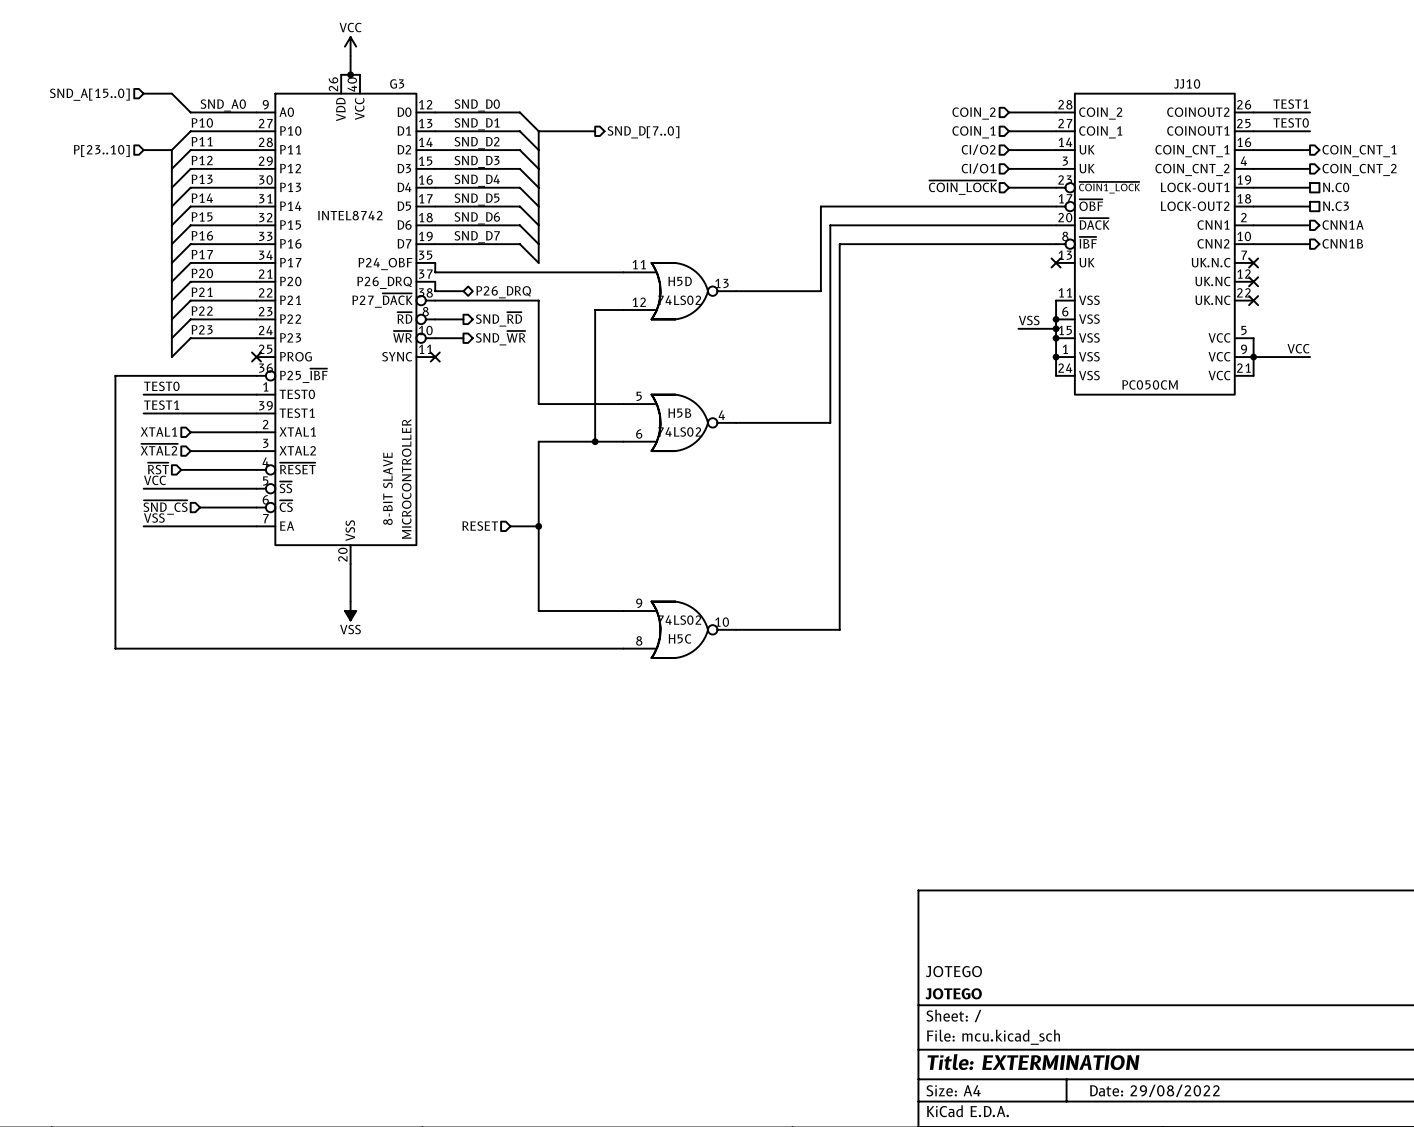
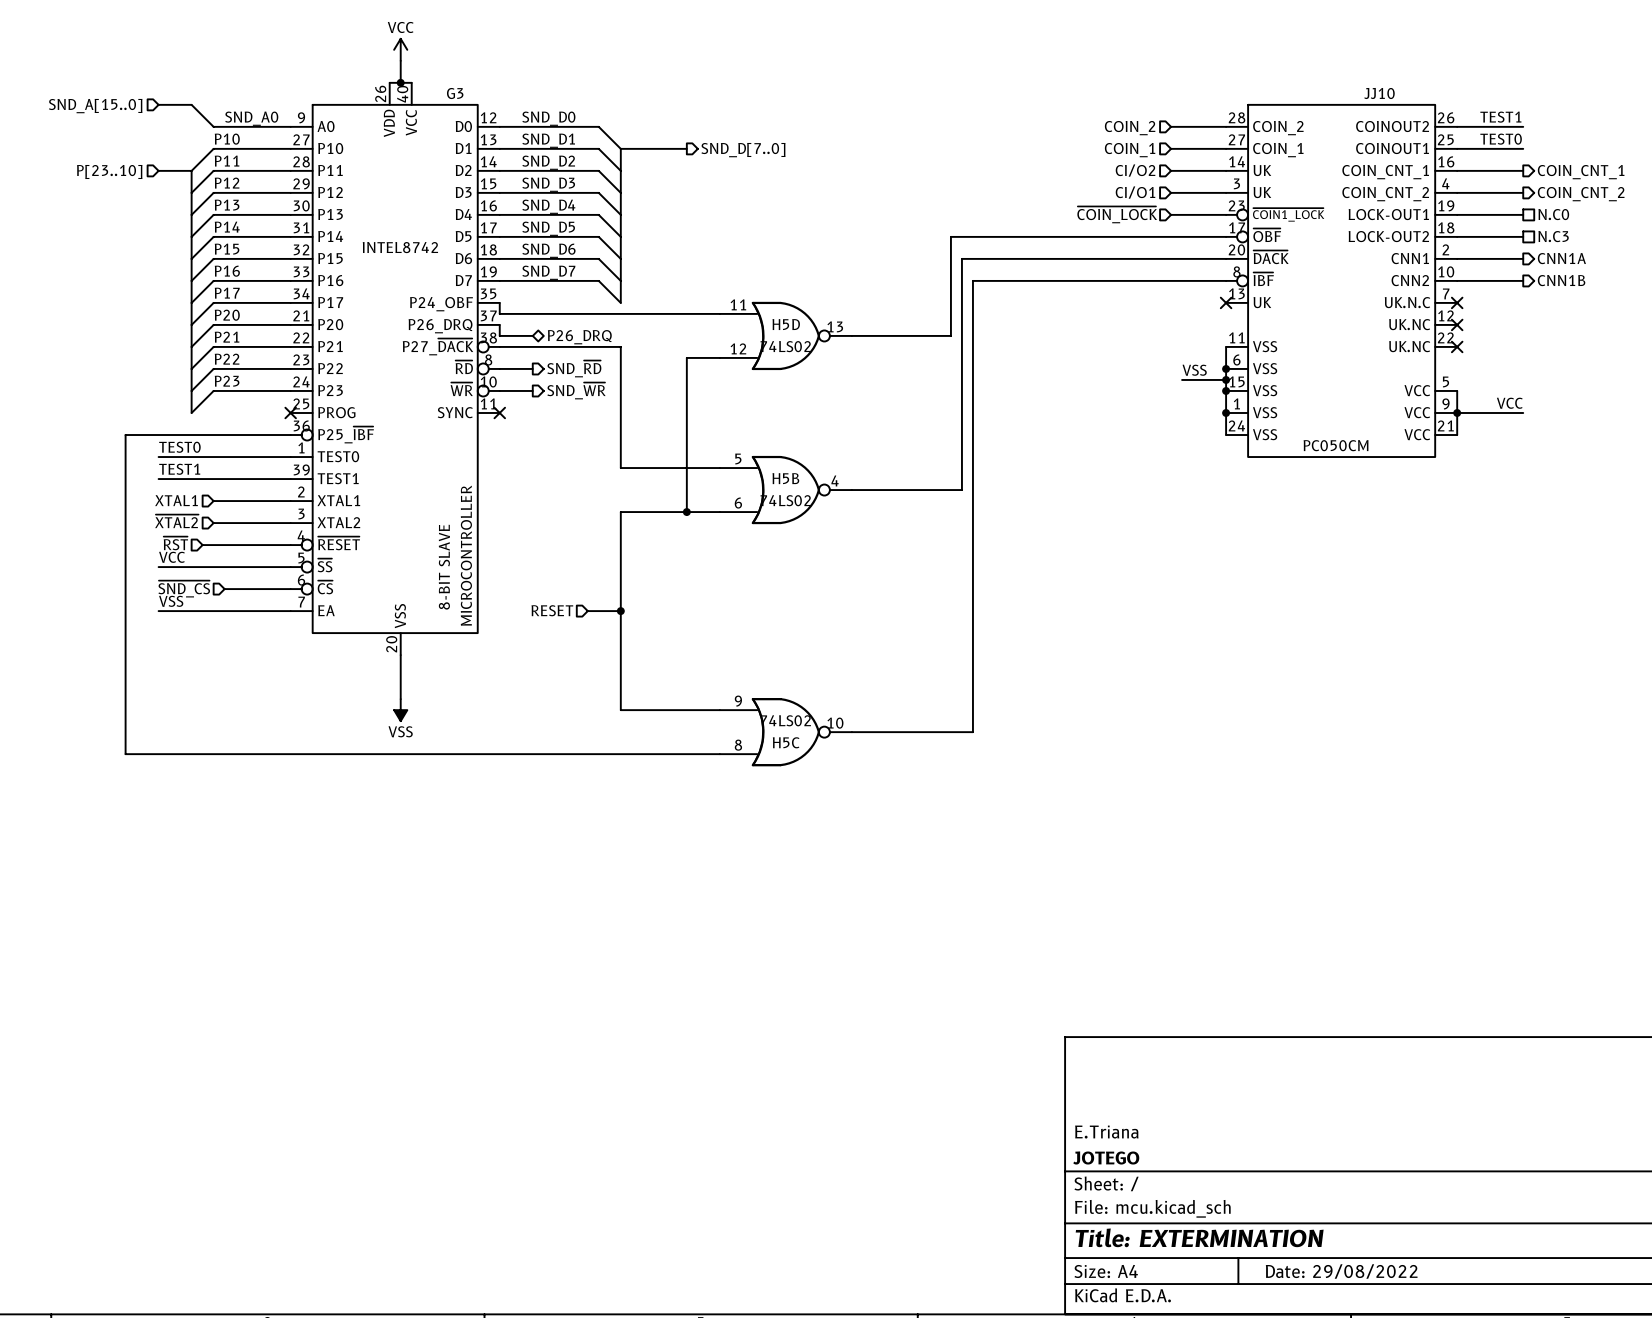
title block: JOTEGO (953, 971) -> E.Triana (1106, 1132)

